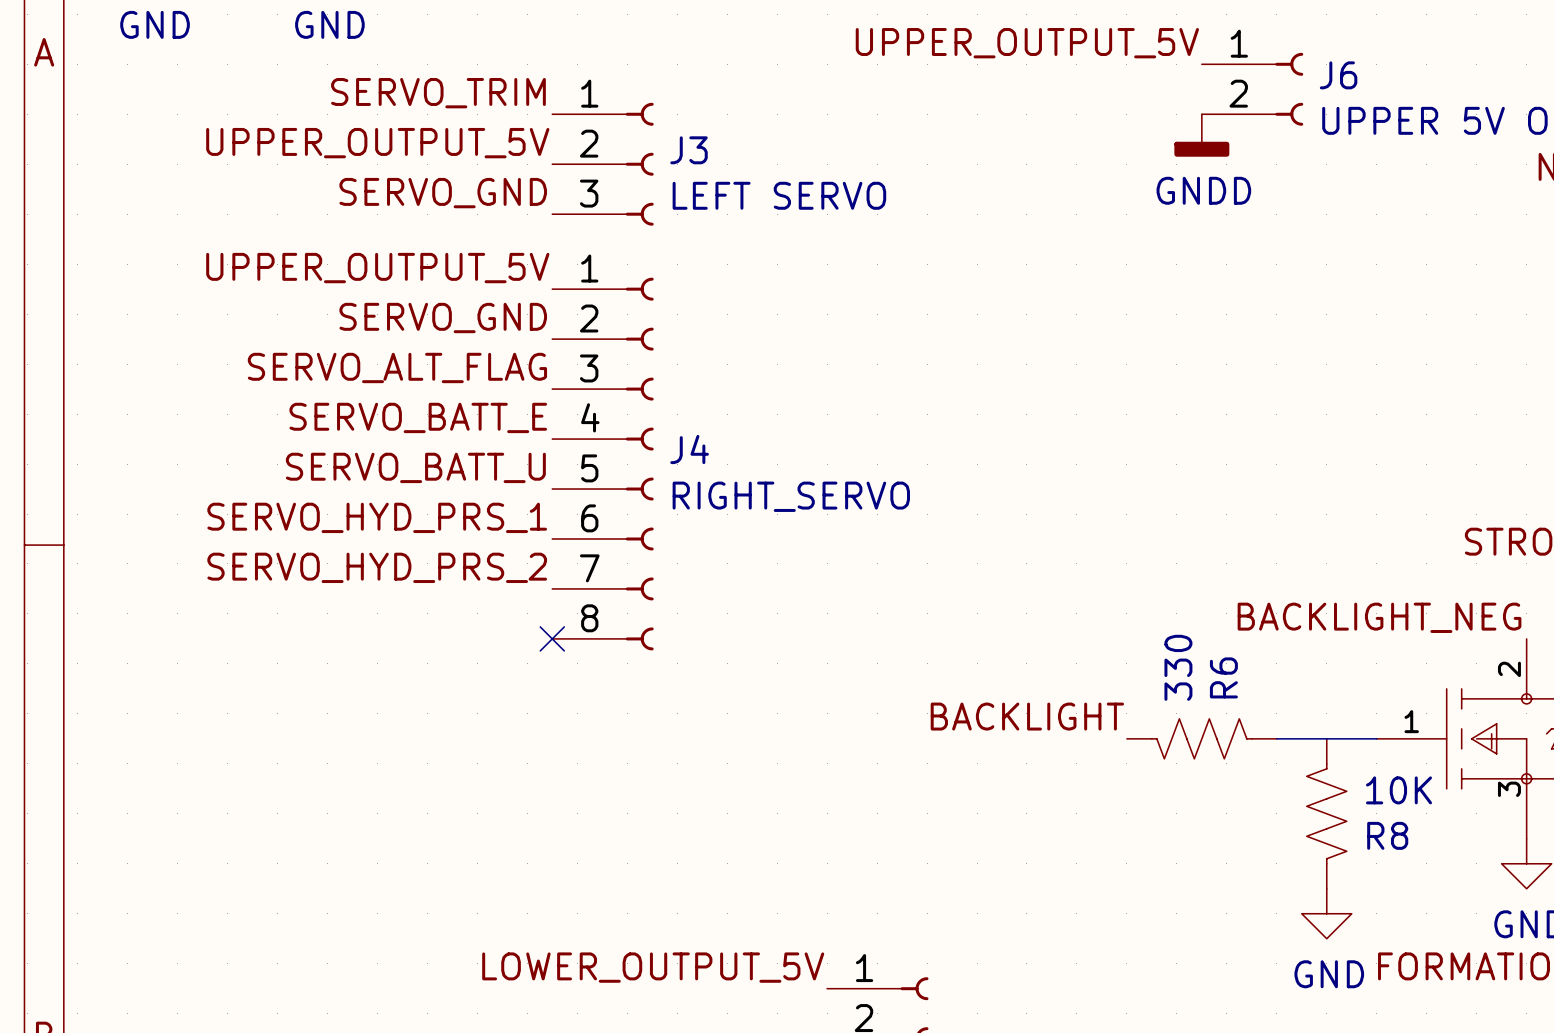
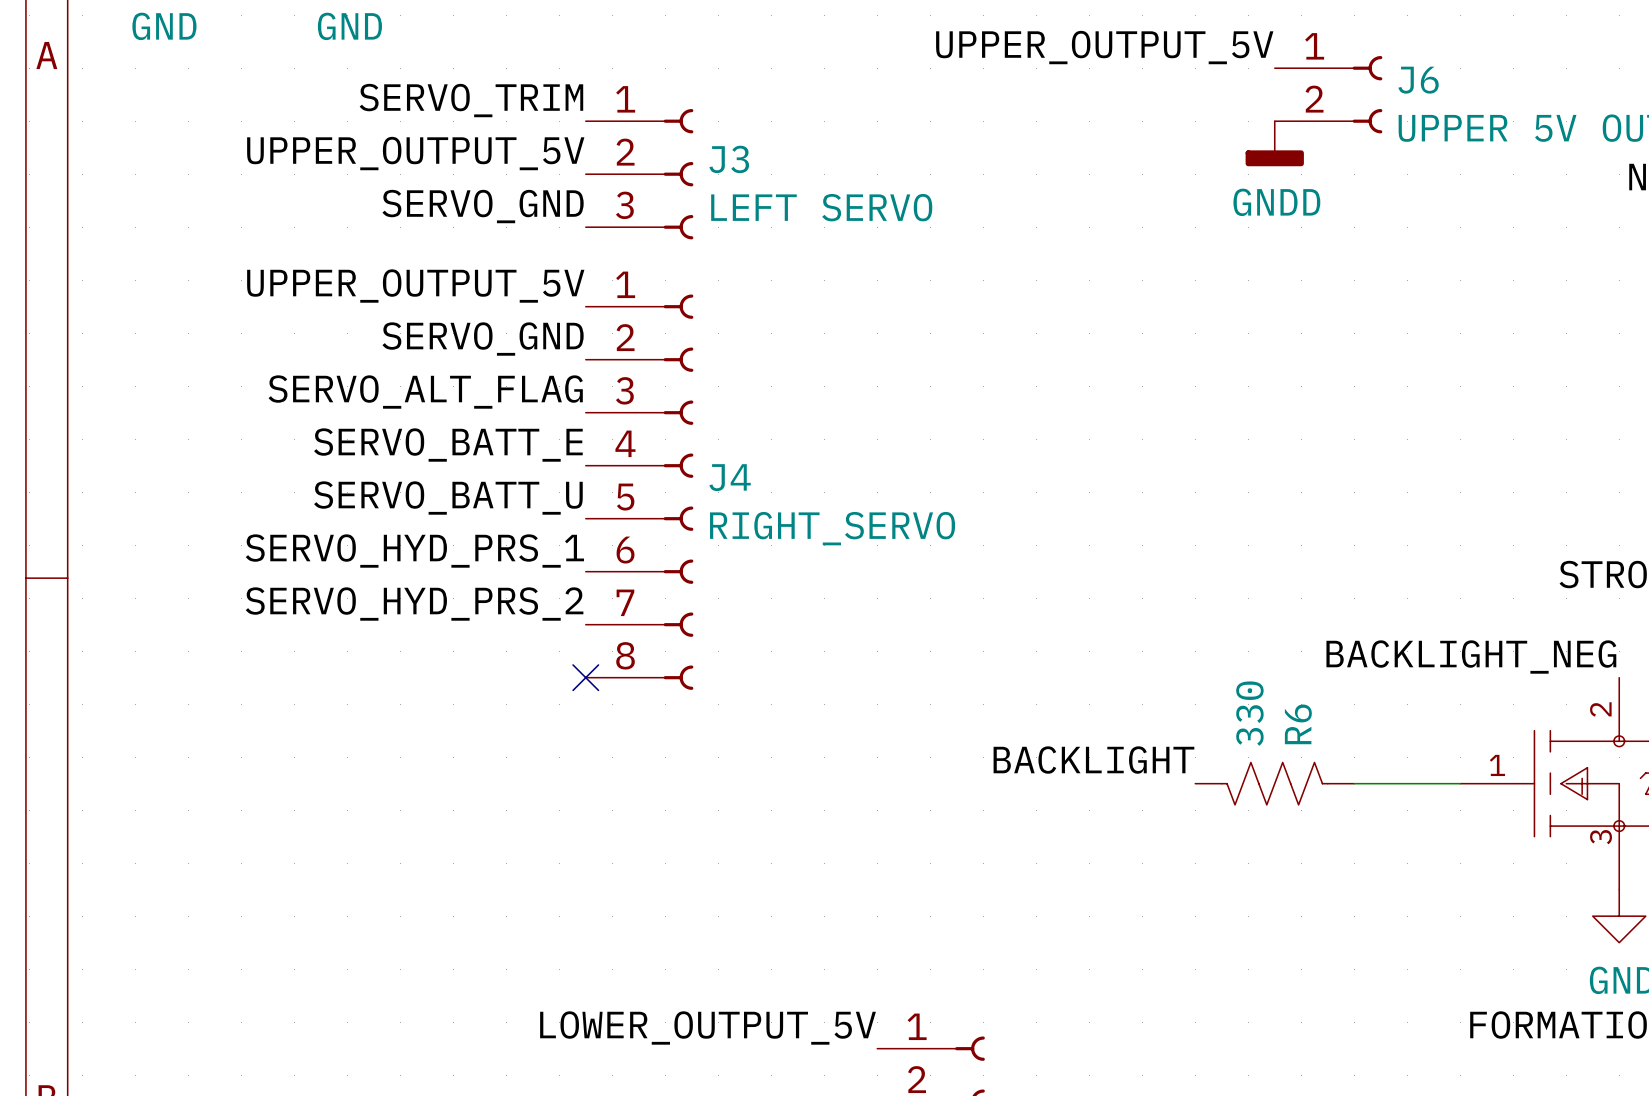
R8: 10K (1326, 813) -> none
power symbol: GND (1326, 913) -> none

